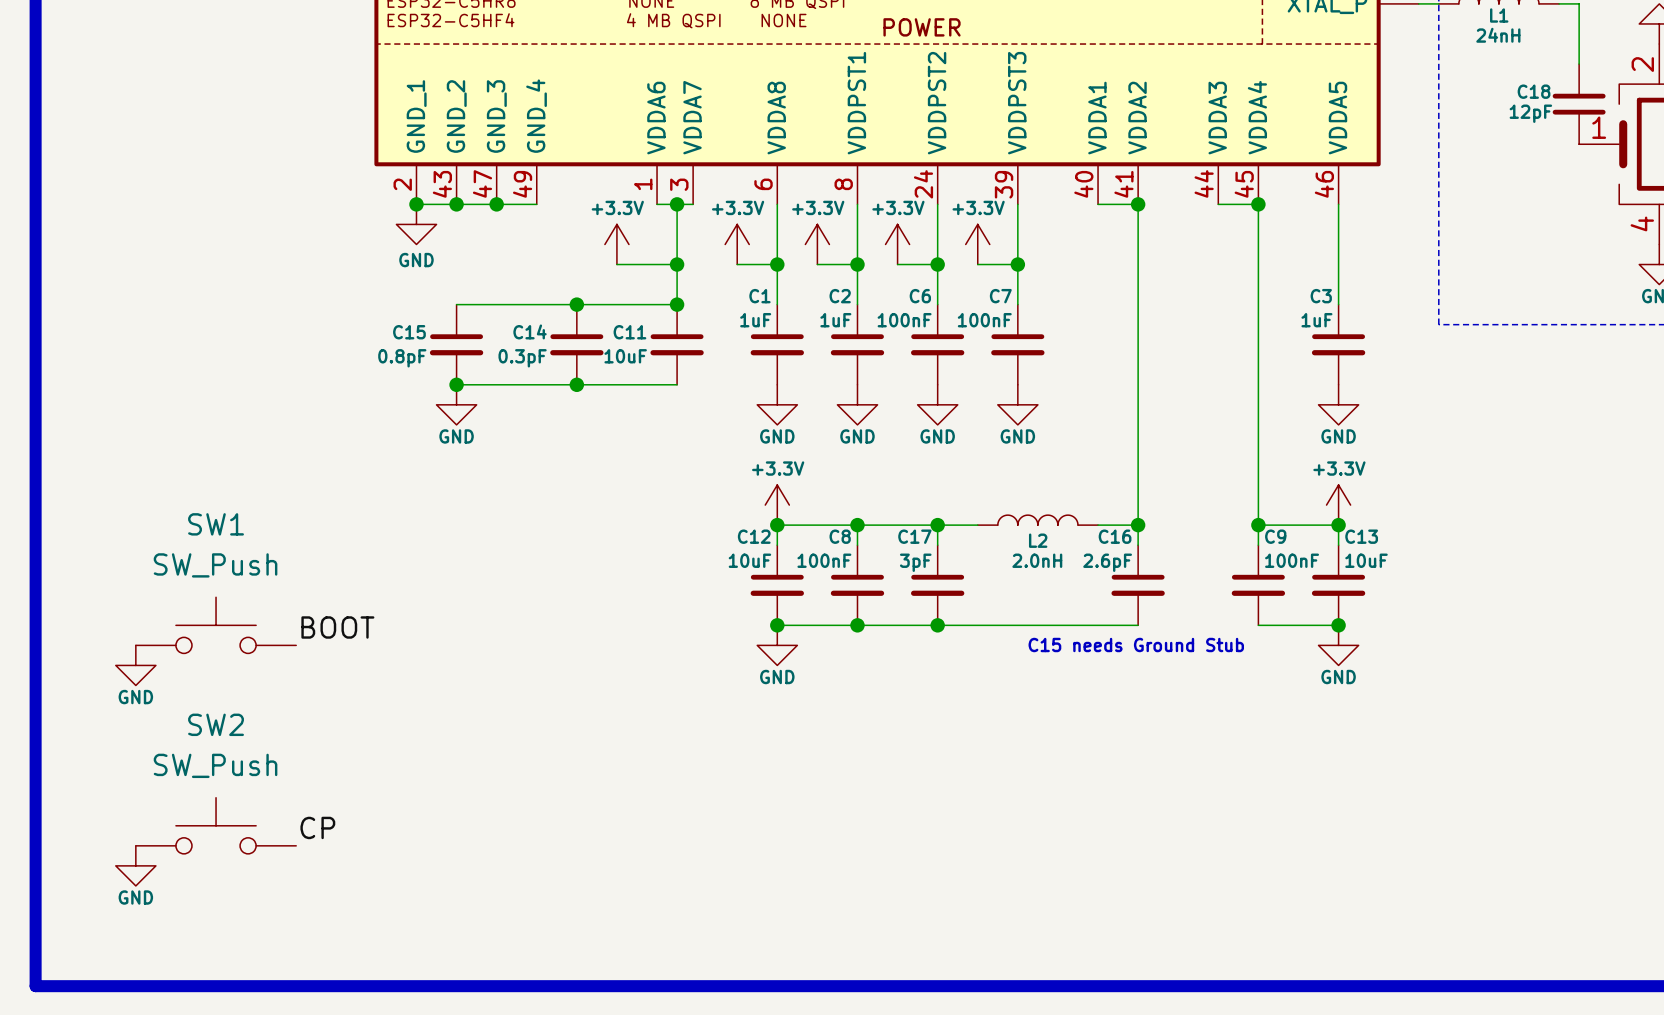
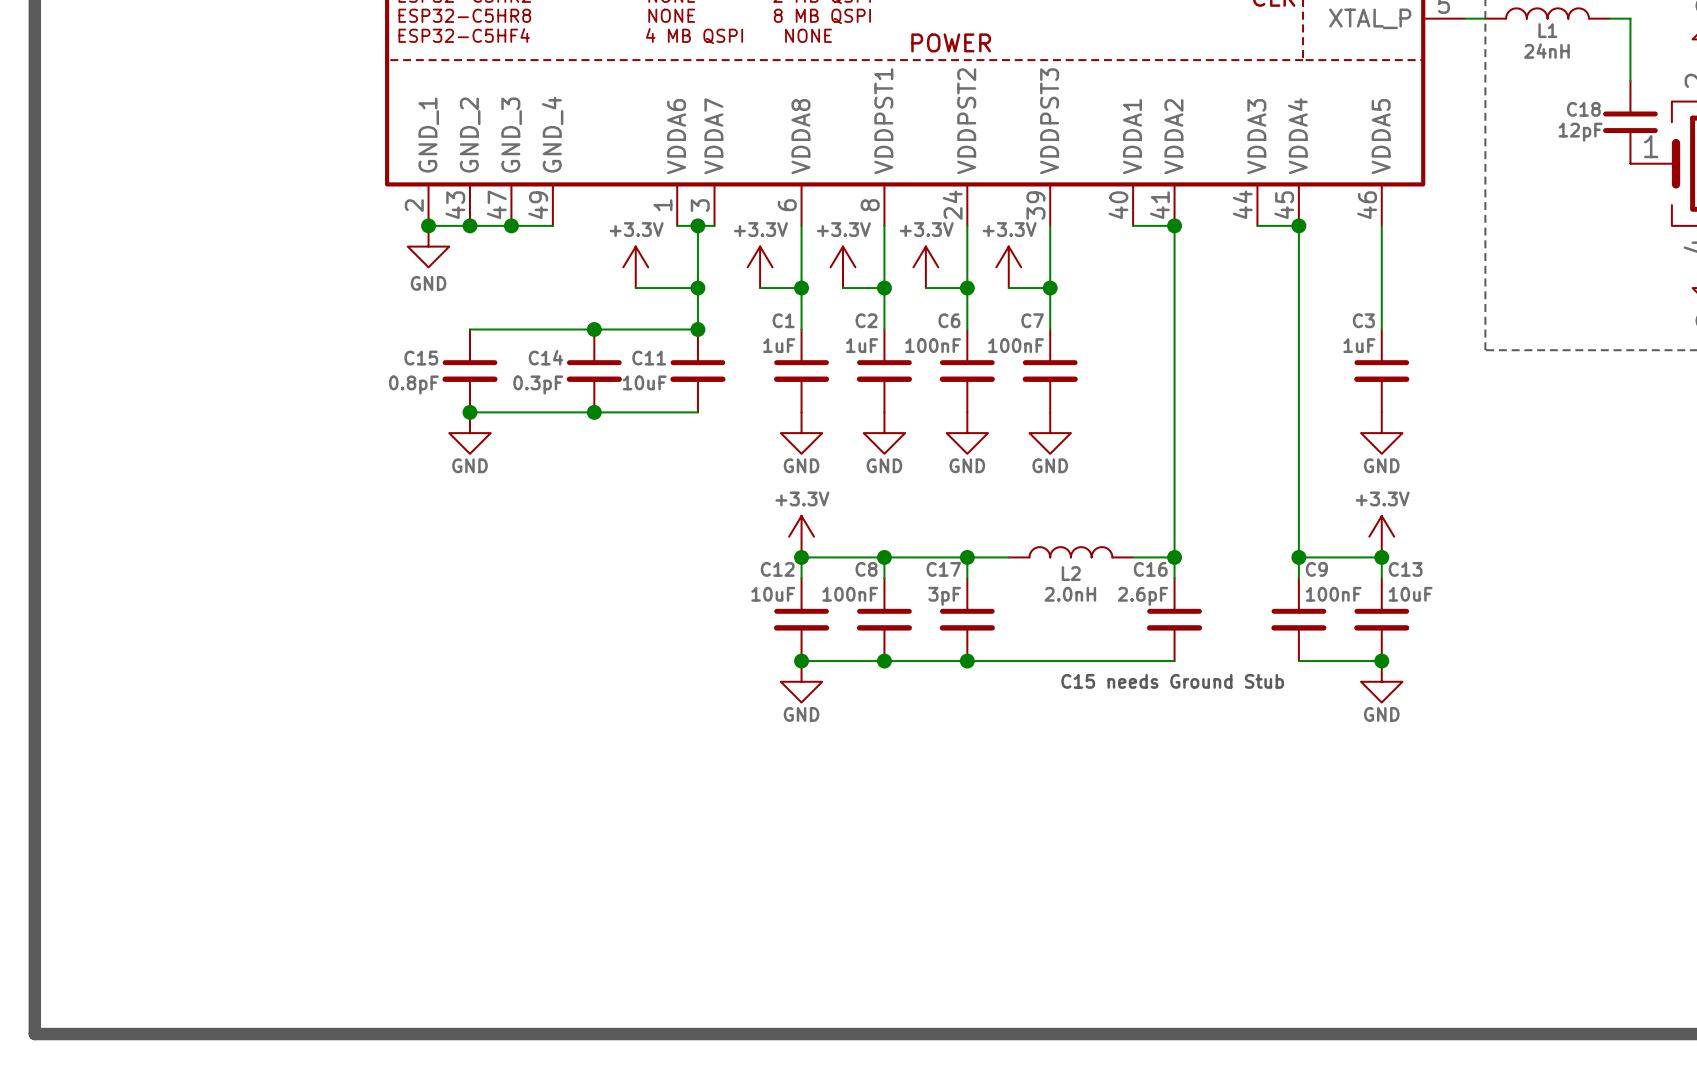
SW1: SW_Push (216, 625) -> none
label: BOOT (337, 627) -> none
power symbol: GND (135, 665) -> none
SW2: SW_Push (216, 825) -> none
label: CP (317, 827) -> none
power symbol: GND (135, 865) -> none

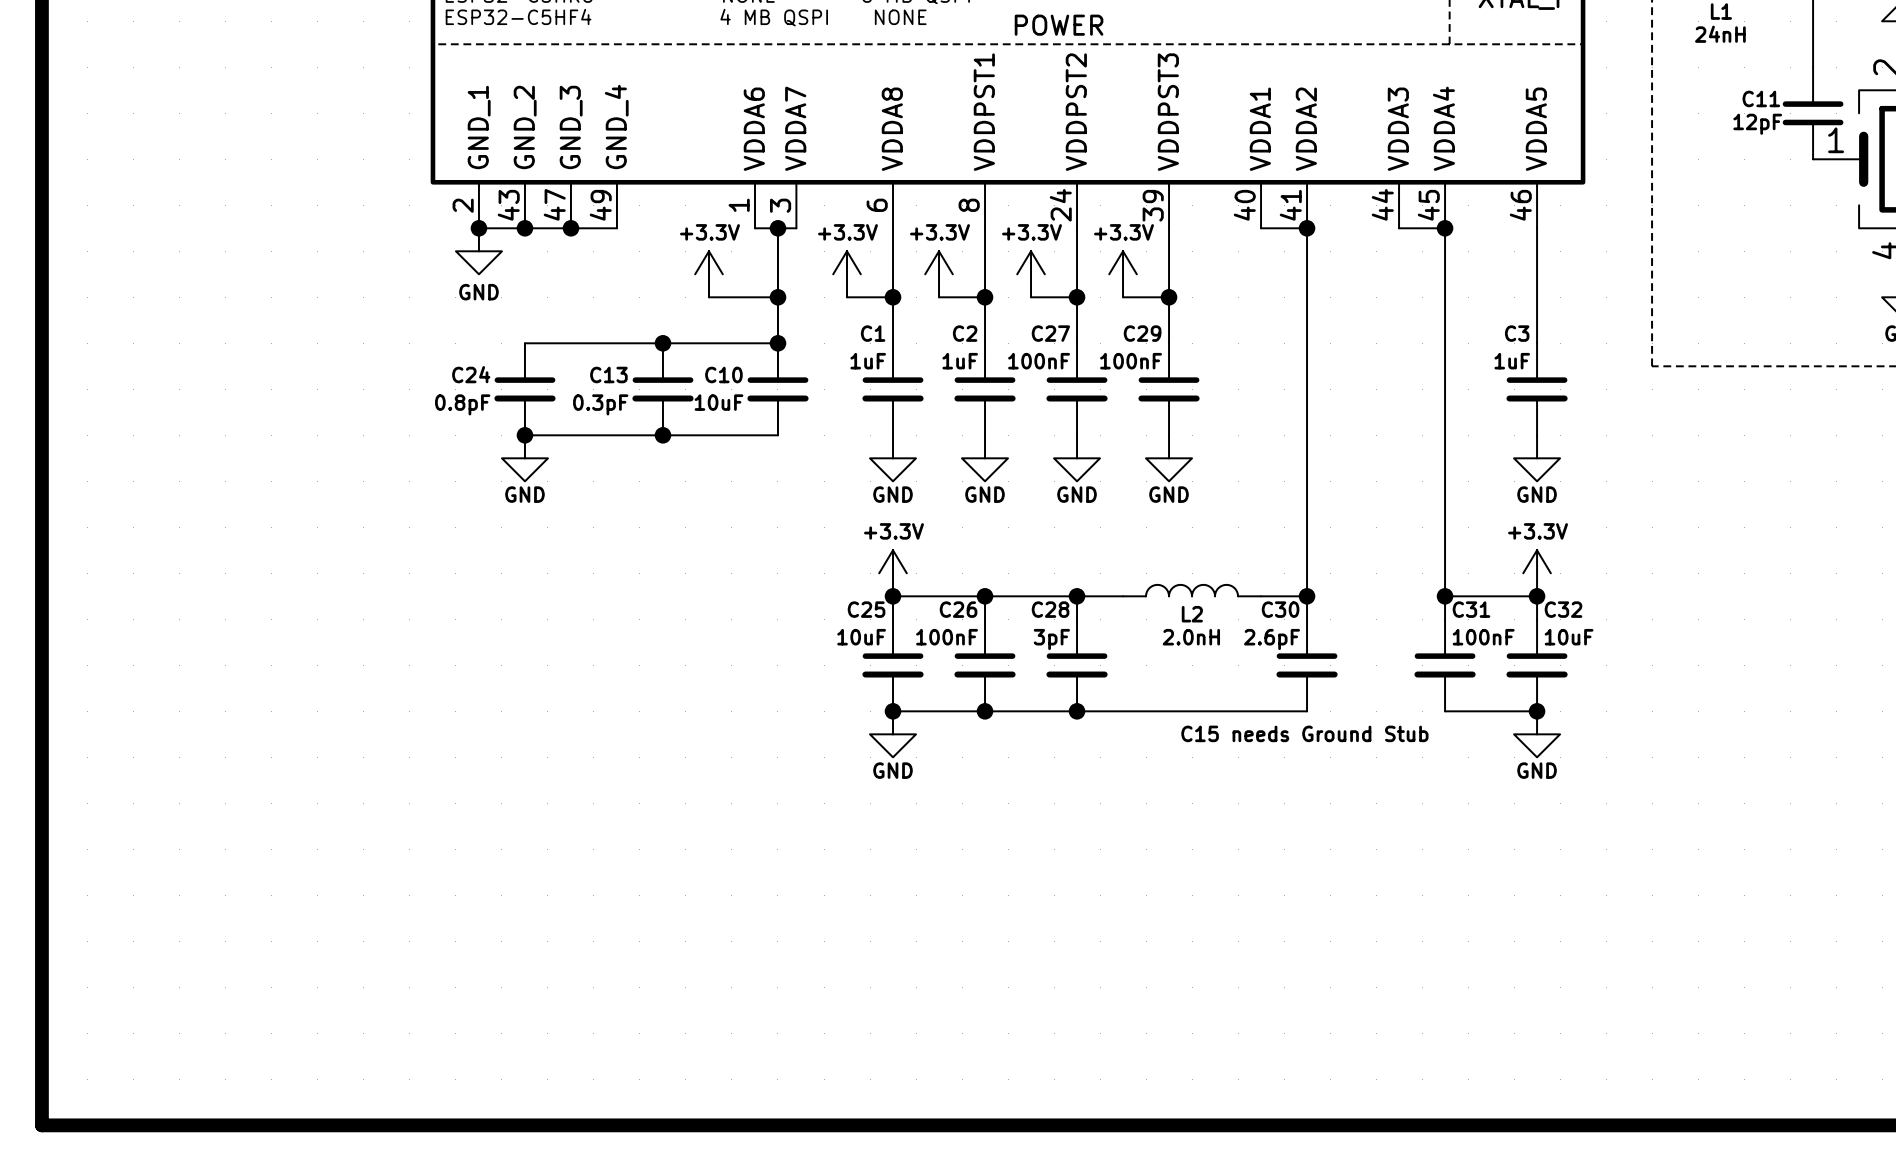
C18 name: C18 (1583, 109) -> C11 (1761, 98)
C6 name: C6 (949, 320) -> C27 (1050, 333)
C7 name: C7 (1032, 320) -> C29 (1142, 333)
C14 name: C14 (545, 357) -> C13 (608, 374)
C15 name: C15 (421, 358) -> C24 (471, 374)
C11 name: C11 (649, 358) -> C10 (723, 374)
C12 name: C12 (777, 569) -> C25 (866, 609)
C8 name: C8 (866, 569) -> C26 (958, 609)
C17 name: C17 (943, 569) -> C28 (1050, 609)
C16 name: C16 (1150, 569) -> C30 (1280, 609)
C9 name: C9 (1316, 569) -> C31 (1471, 609)
C13 name: C13 (1405, 569) -> C32 (1563, 609)

